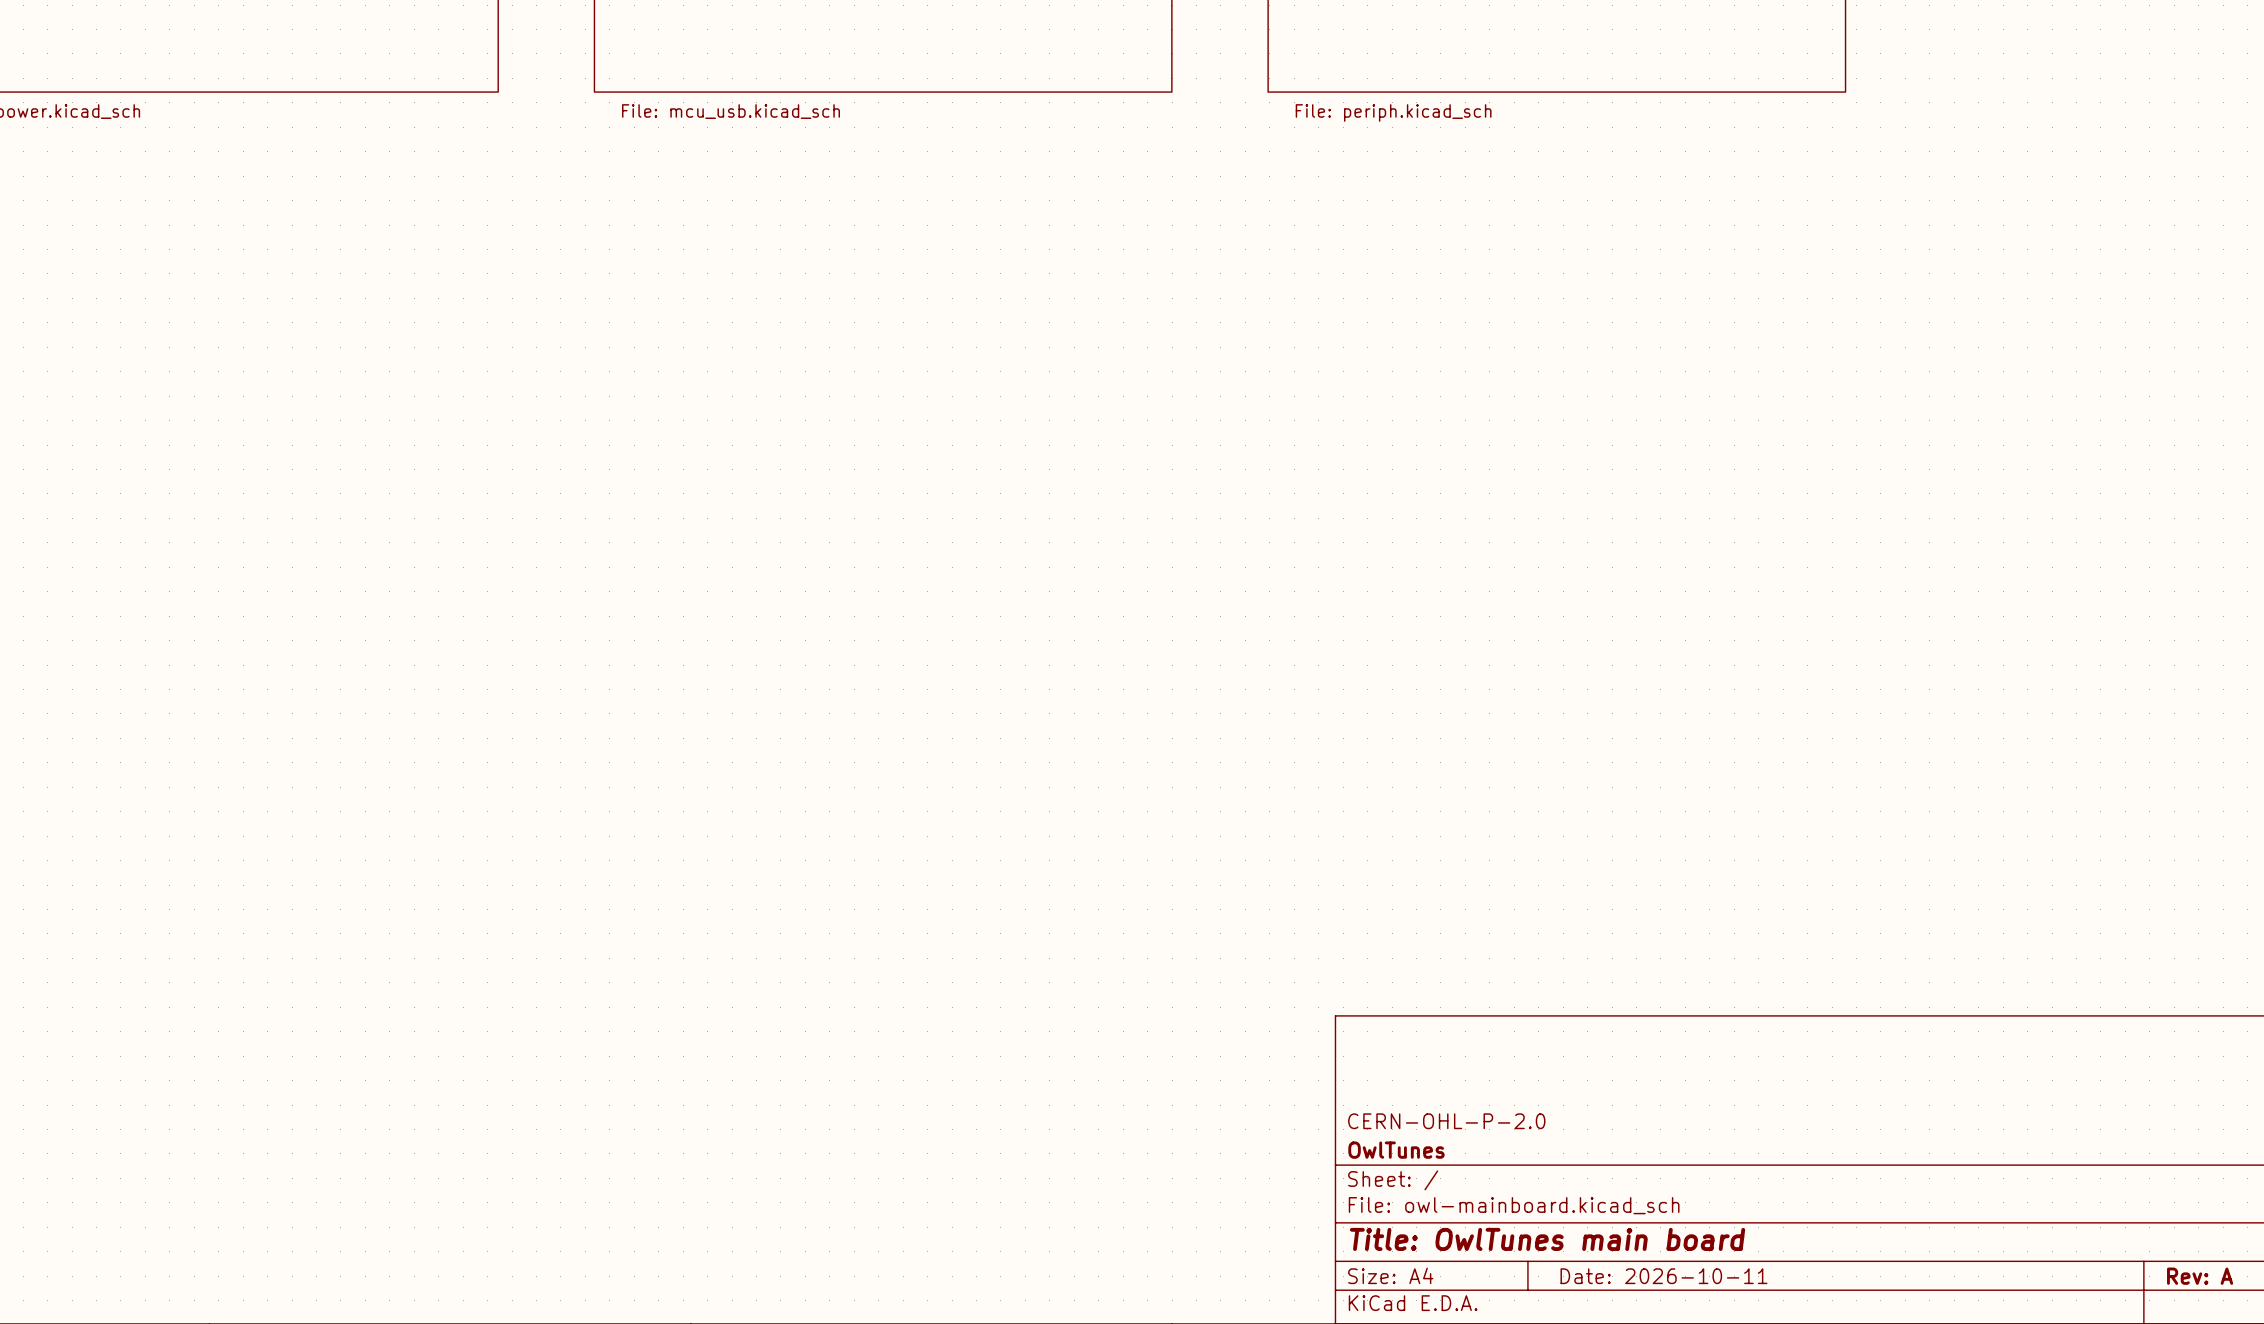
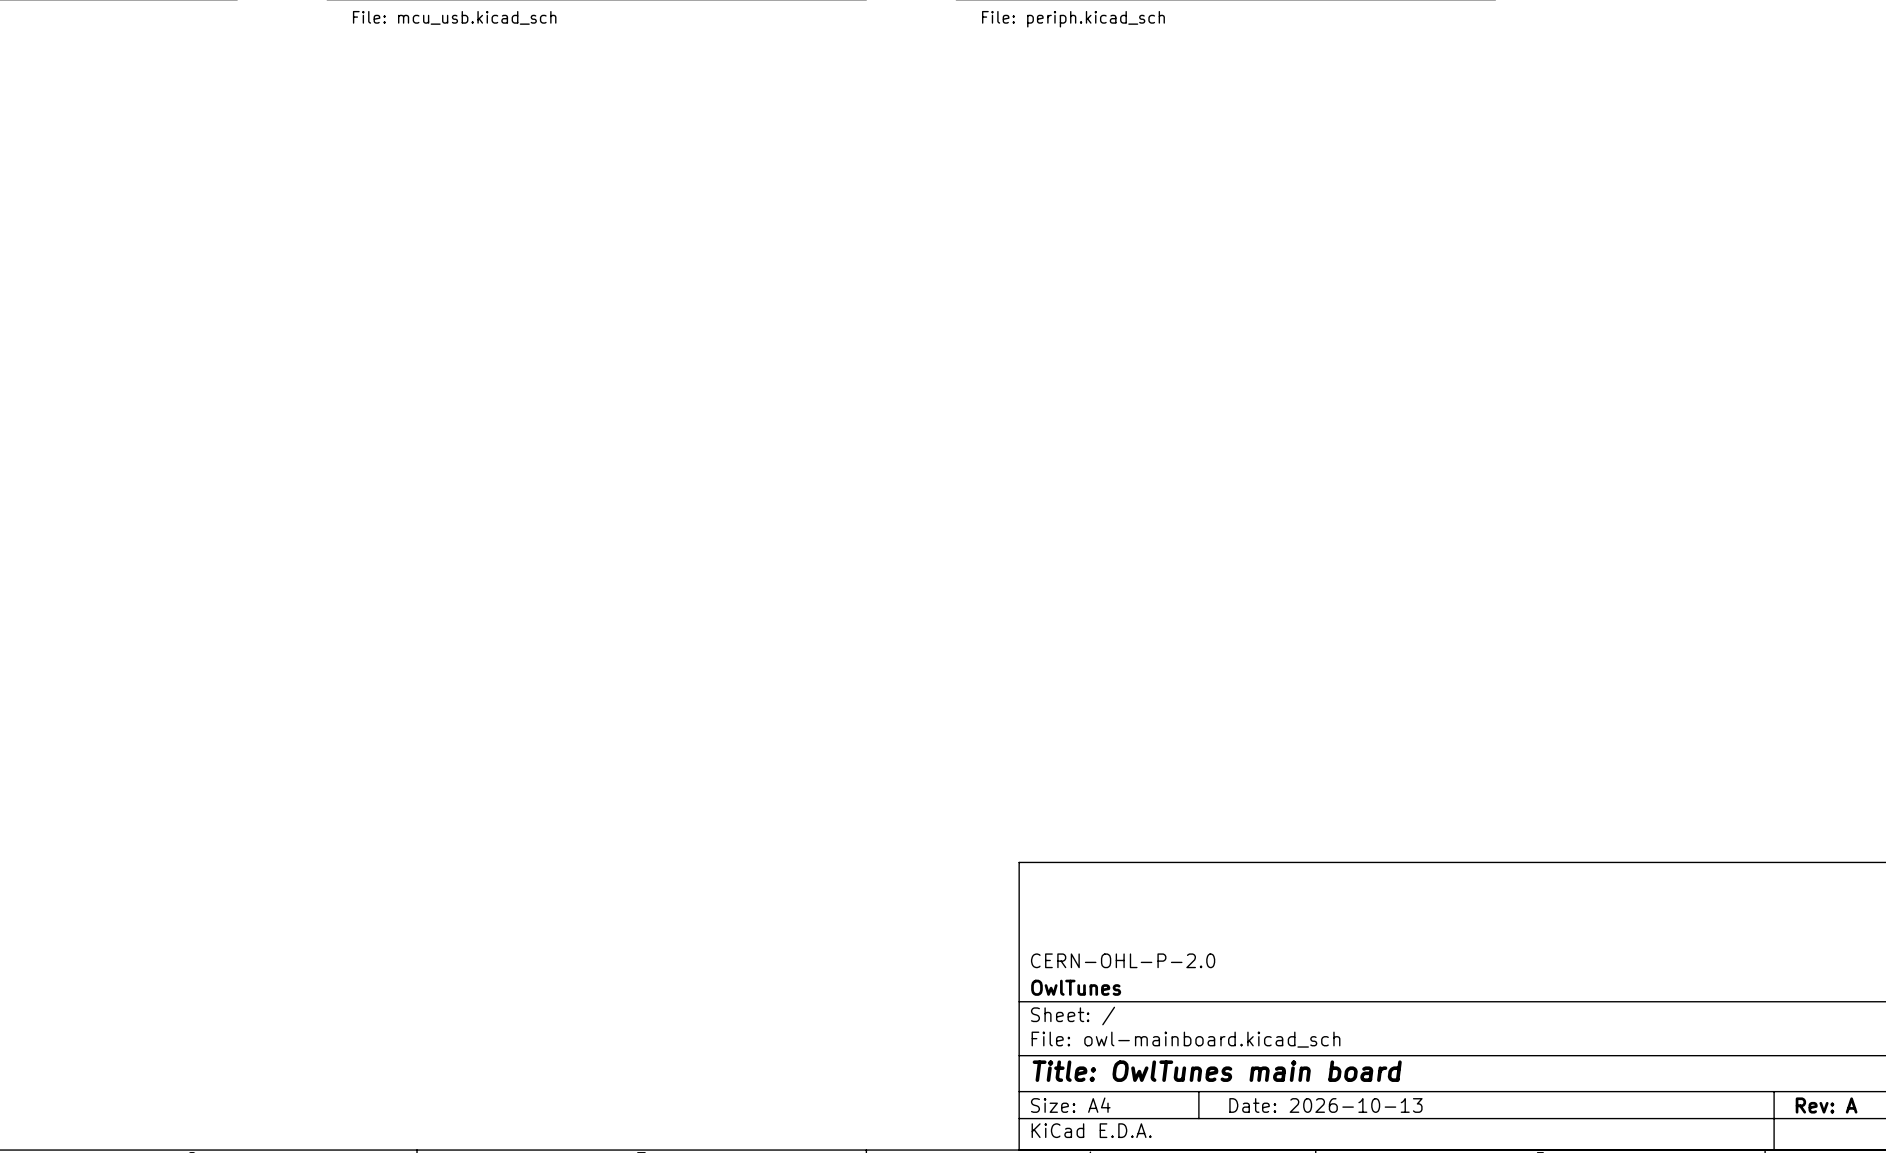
title block: Date: 2026-10-11 (1663, 1276) -> Date: 2026-10-13 (1325, 1105)

